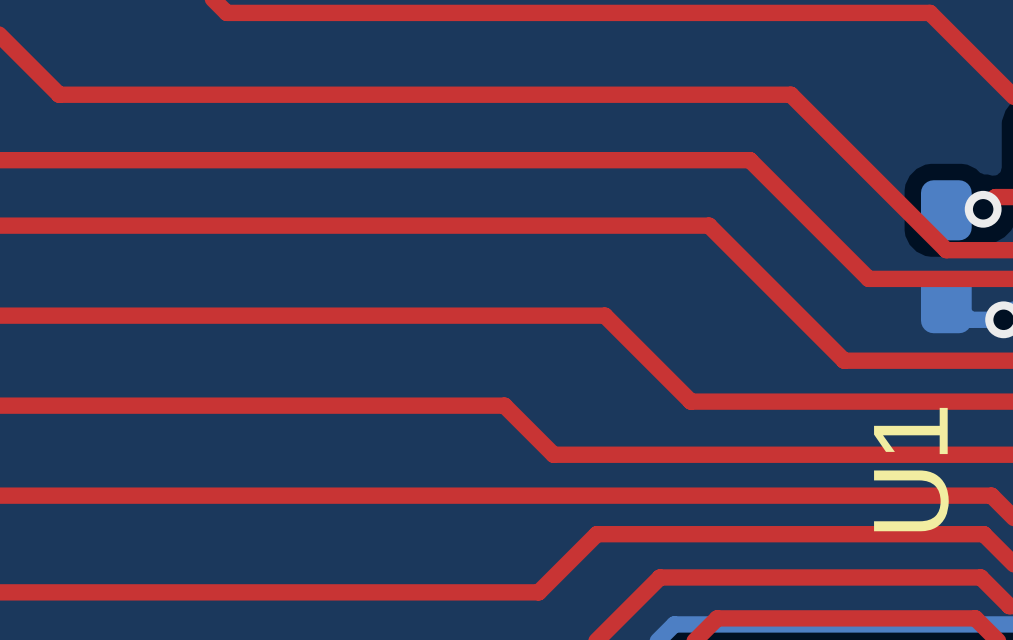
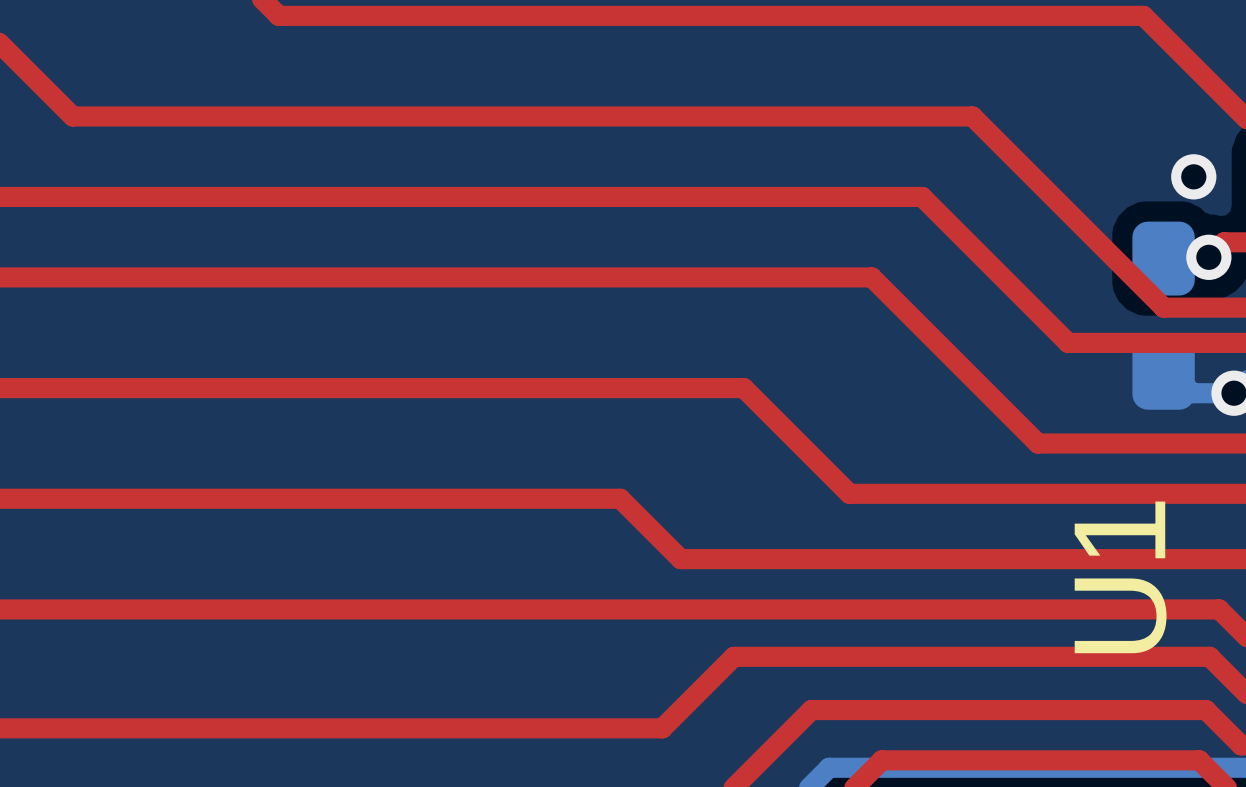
via: none -> (1193, 176)

